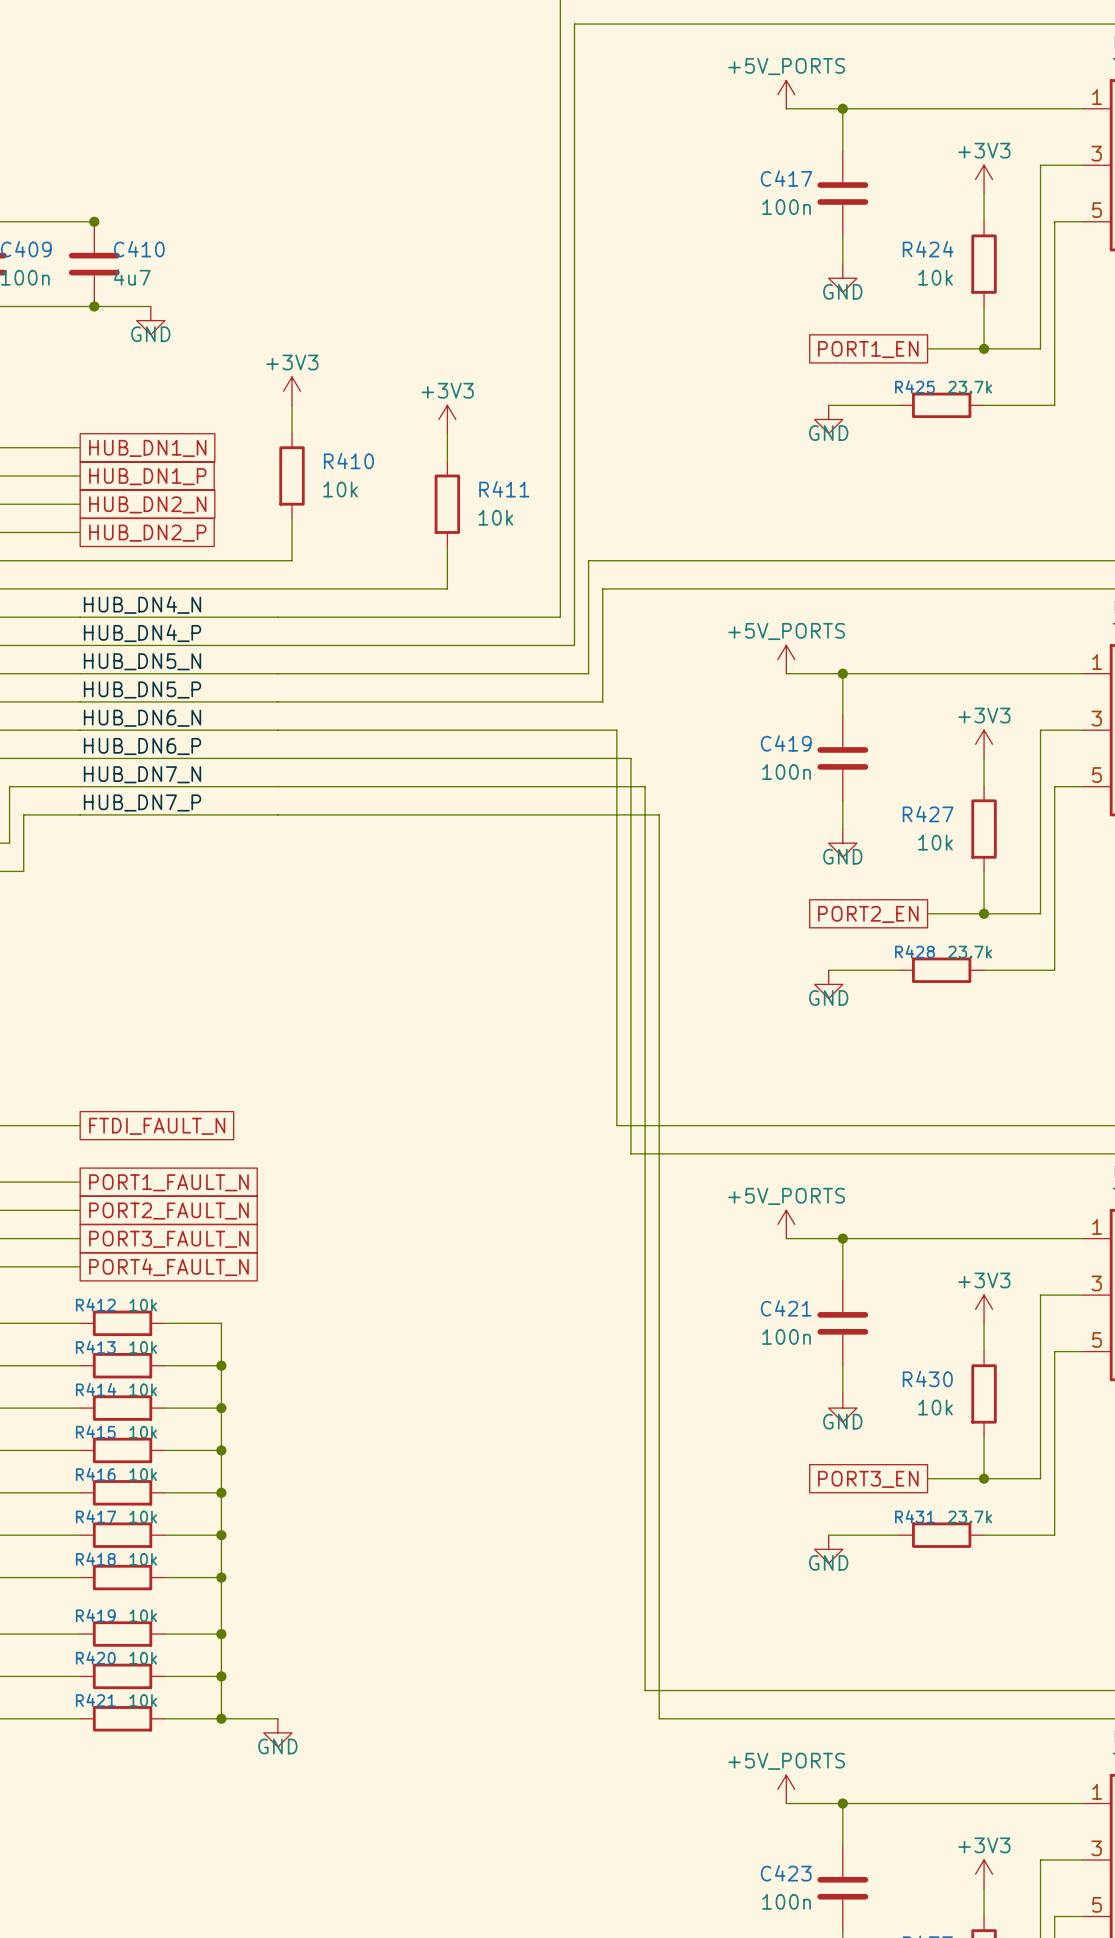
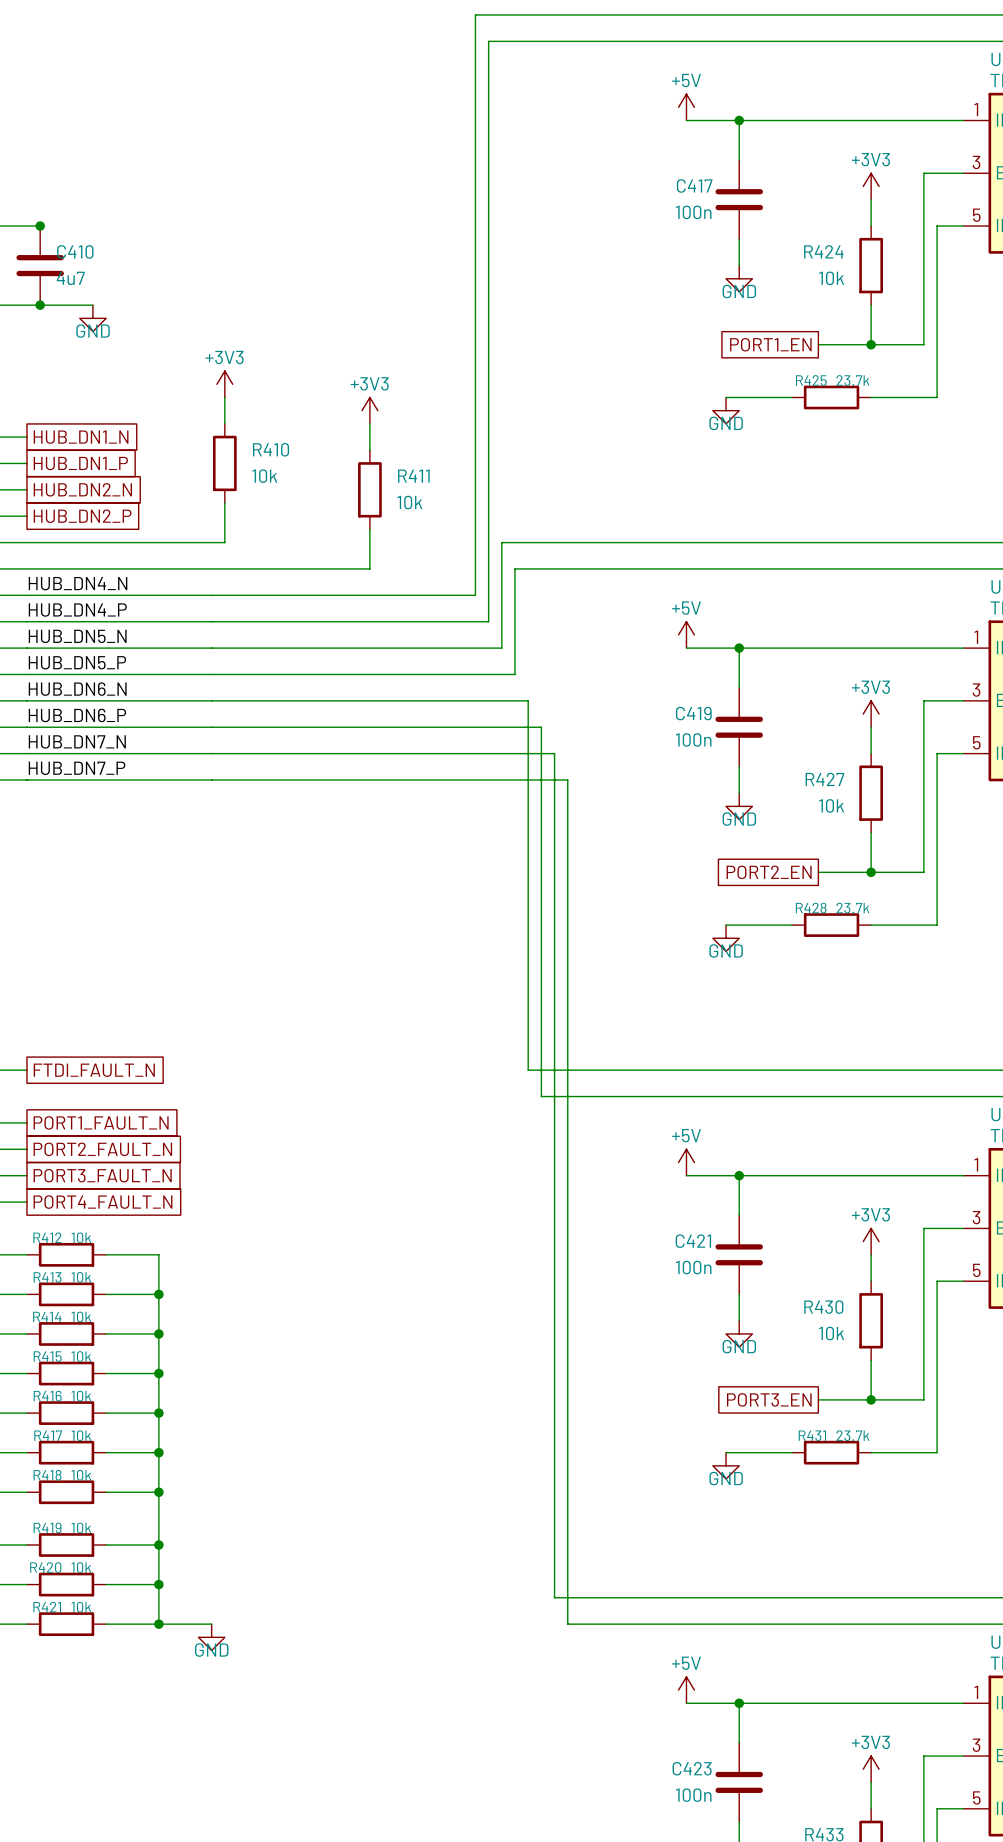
power symbol: +5V_PORTS (786, 94) -> +5V (686, 107)
power symbol: +5V_PORTS (786, 659) -> +5V (686, 634)
power symbol: +5V_PORTS (786, 1224) -> +5V (686, 1162)
power symbol: +5V_PORTS (786, 1789) -> +5V (686, 1690)

